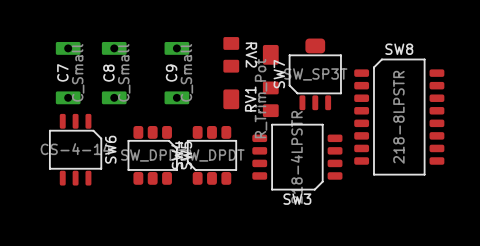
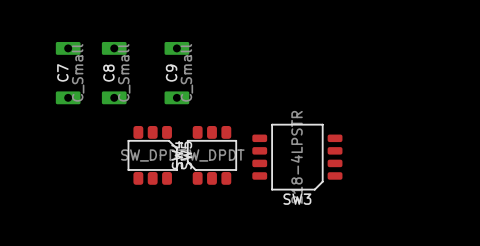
RV2: (251, 54) -> none
SW7: SW_SP3T (315, 74) -> none
RV1: R_Trim_Pot (251, 99) -> none
SW8: 218-8LPSTR (399, 117) -> none
SW6: CS-4-14 (75, 149) -> none

